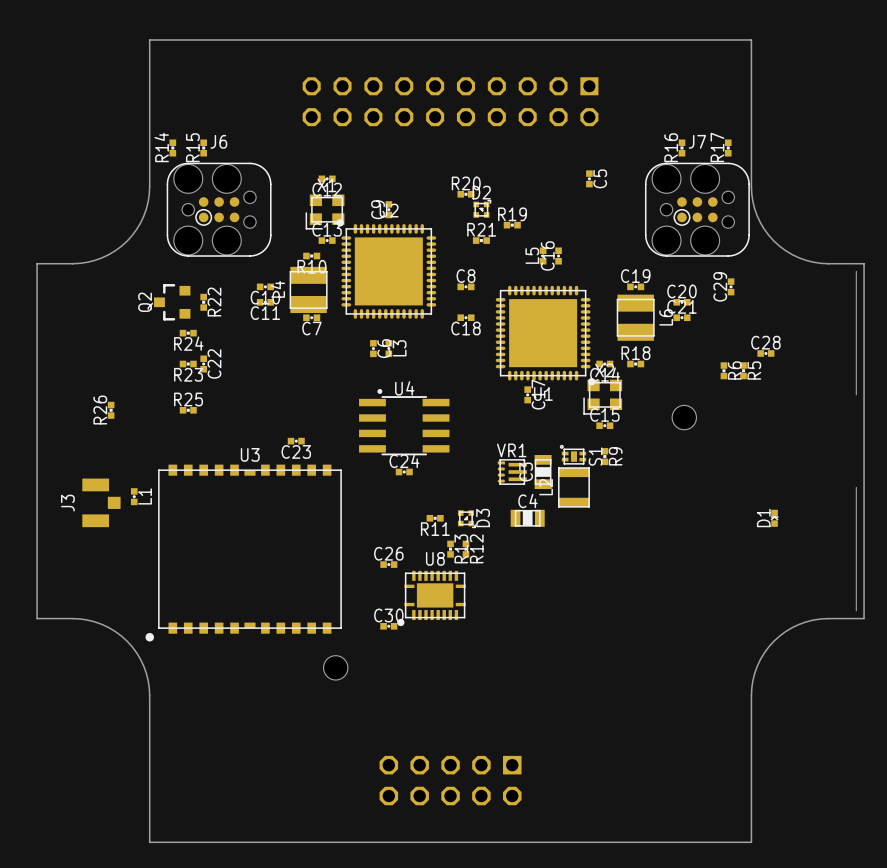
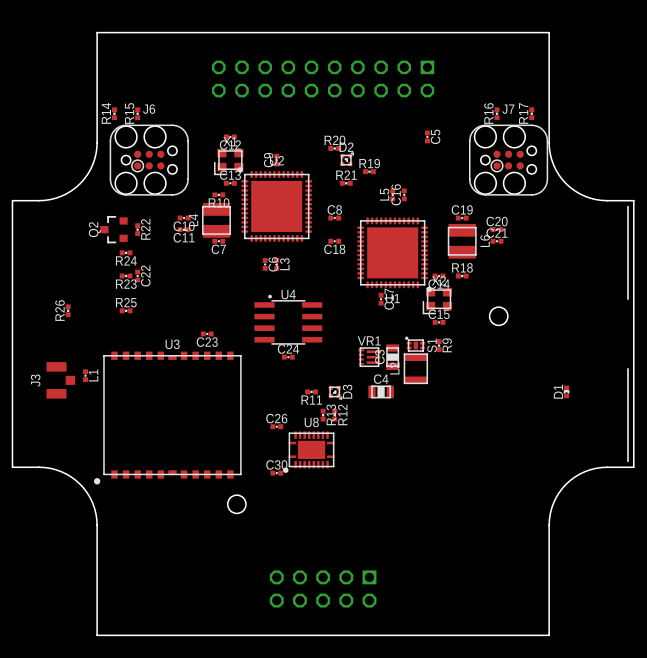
C29: (731, 286) -> none
C28: (765, 353) -> none
R6: (723, 370) -> none
R5: (743, 370) -> none

